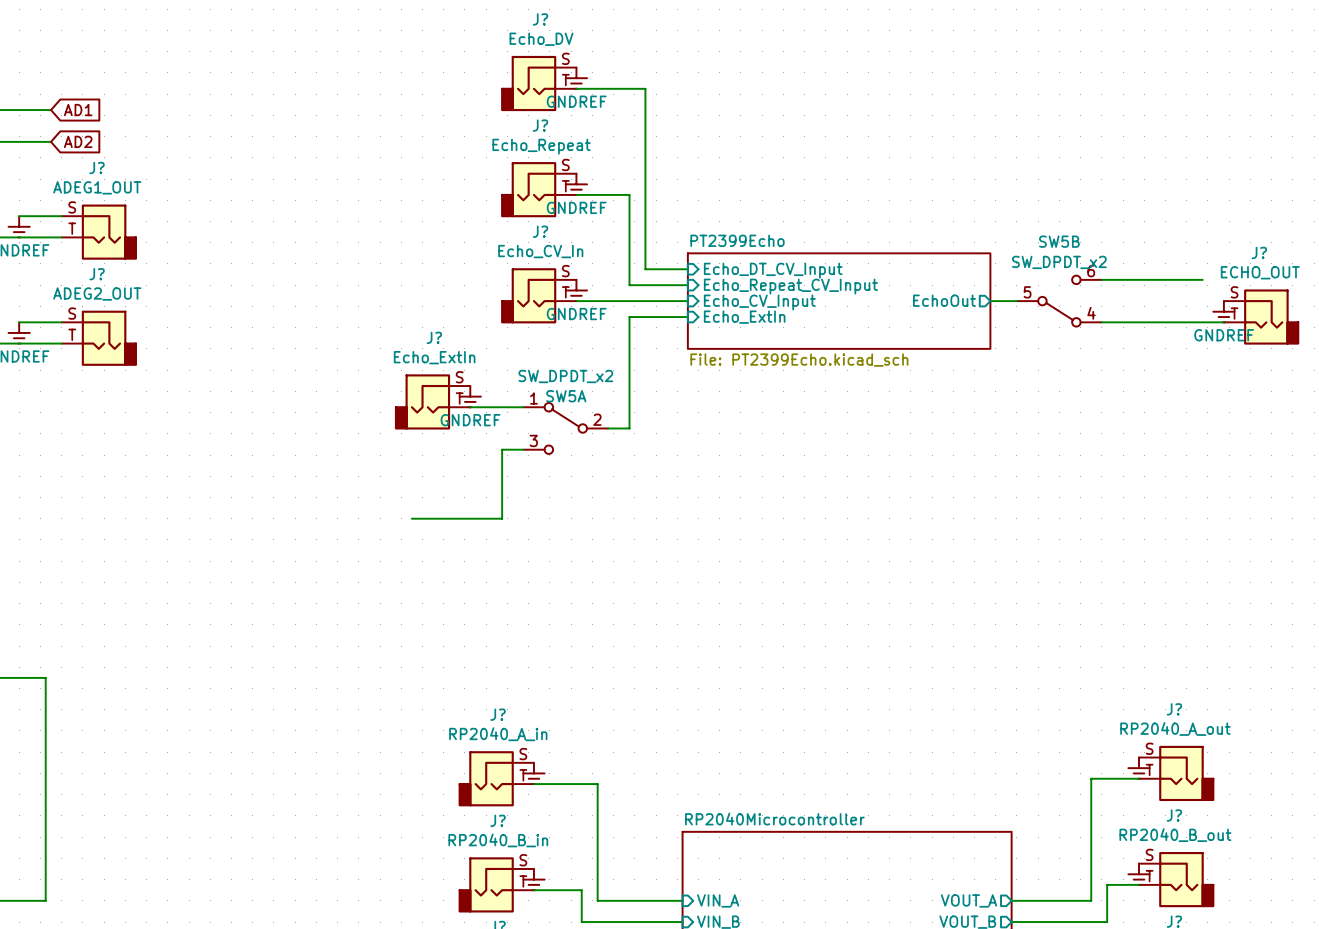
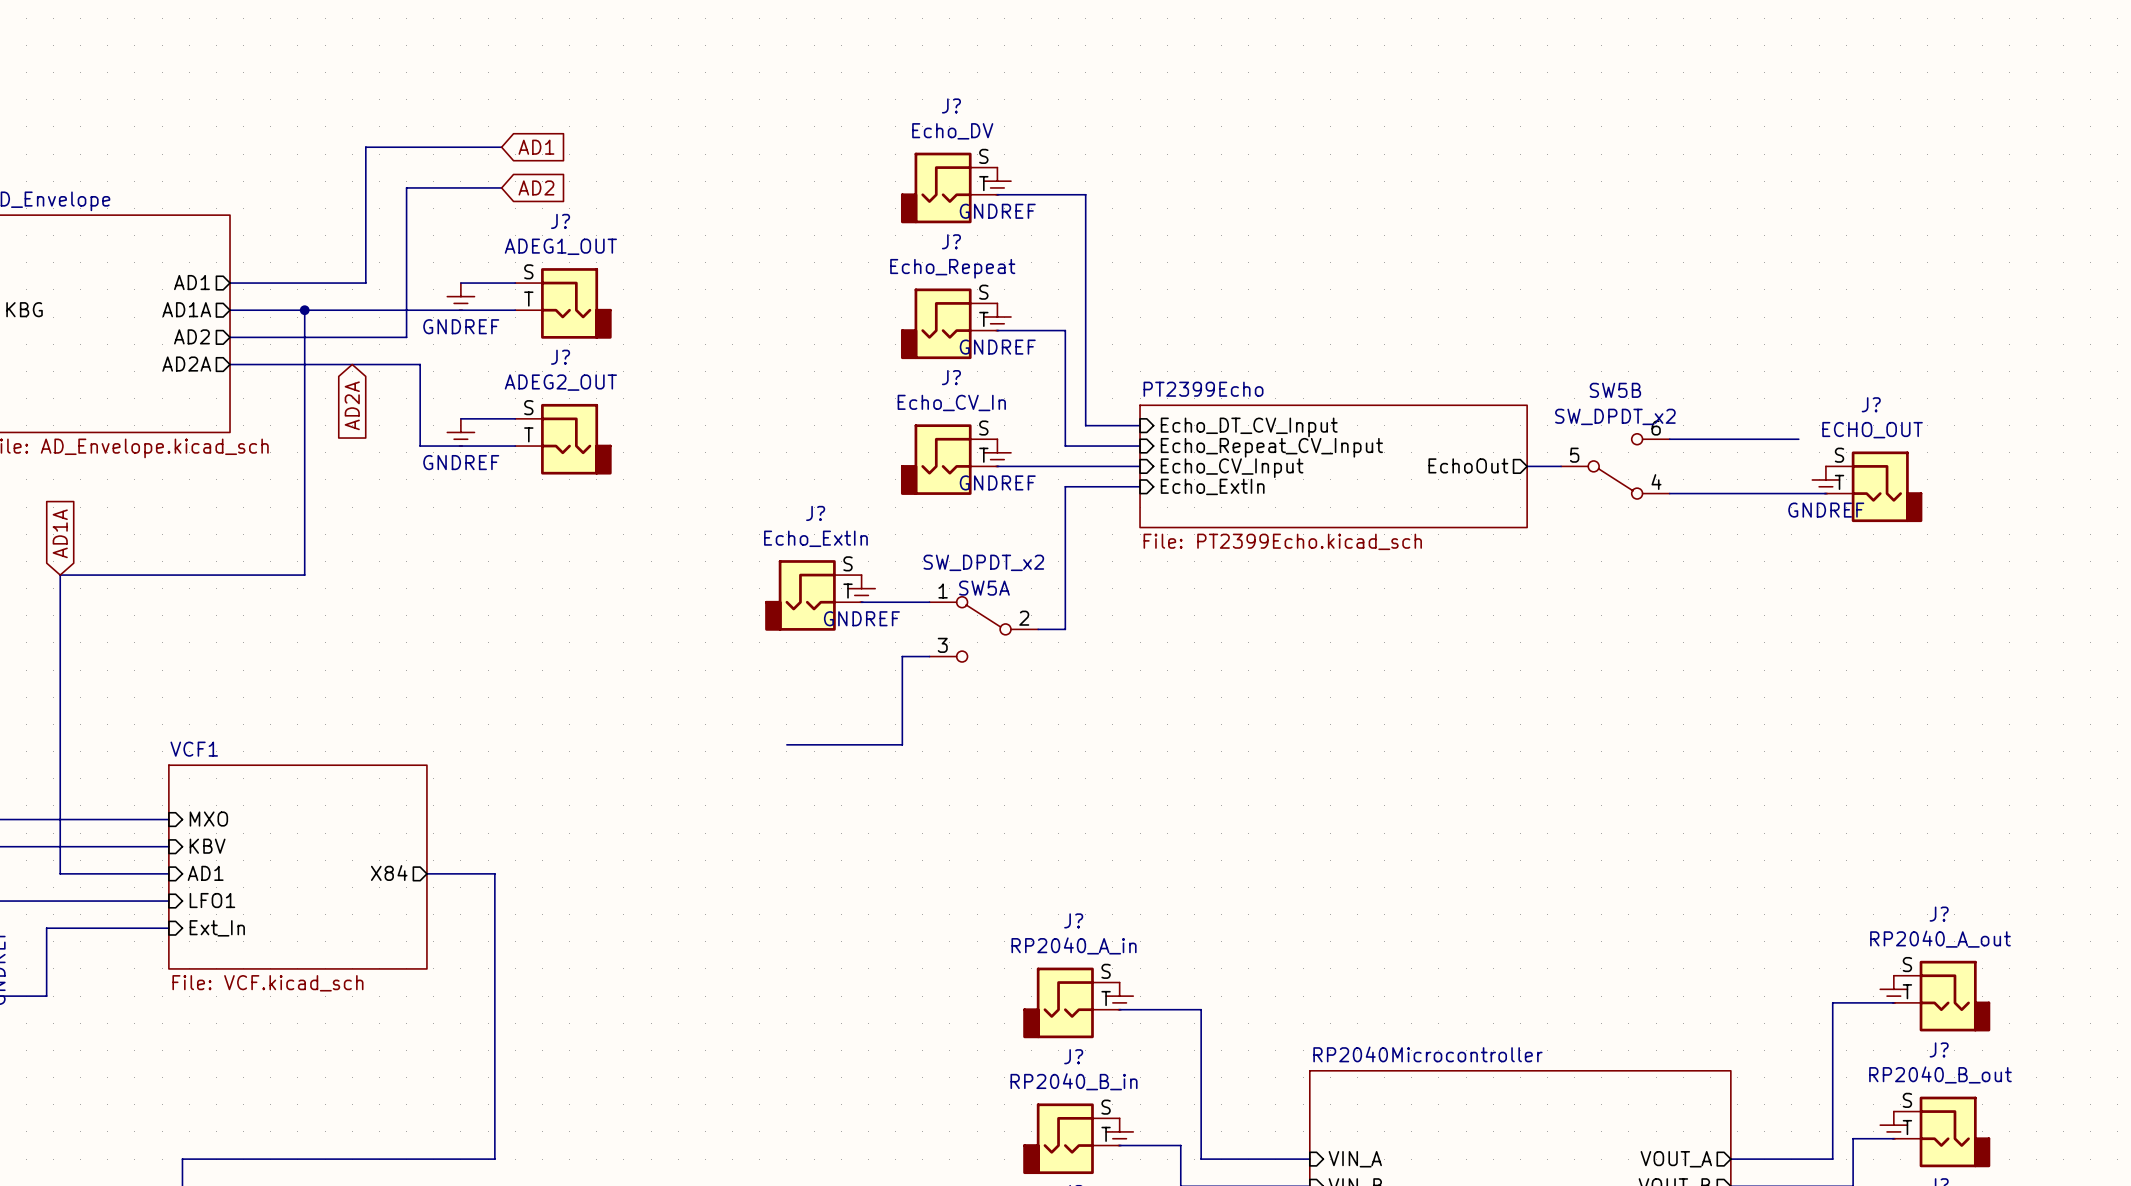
power symbol: GNDREF (576, 78) -> none
J? position: (538, 83) -> (949, 187)
wire: (576, 88) (645, 88) (645, 269) (687, 269) -> (997, 194) (1085, 194) (1085, 425) (1140, 425)
power symbol: none -> GNDREF (997, 181)
power symbol: GNDREF (576, 184) -> none
J? position: (538, 189) -> (949, 323)
wire: (576, 194) (629, 194) (629, 285) (687, 285) -> (997, 330) (1065, 330) (1065, 446) (1140, 446)
power symbol: none -> GNDREF (997, 317)
sheet pin position: Echo_DT_CV_Input (773, 270) -> Echo_DT_CV_Input (1249, 427)
wire: (1101, 279) (1202, 279) -> (1669, 439) (1798, 439)
sheet pin position: Echo_Repeat_CV_Input (790, 286) -> Echo_Repeat_CV_Input (1271, 447)
power symbol: GNDREF (576, 290) -> none
J? position: (538, 295) -> (949, 459)
sheet pin position: EchoOut (944, 300) -> EchoOut (1468, 465)
wire: (576, 301) (687, 301) -> (997, 466) (1140, 466)
sheet PT2399Echo position: (839, 301) -> (1333, 466)
wire: (990, 301) (1016, 301) -> (1527, 466) (1561, 466)
SW5B position: (1059, 301) -> (1615, 466)
sheet pin position: Echo_CV_Input (759, 302) -> Echo_CV_Input (1232, 468)
power symbol position: GNDREF (1223, 311) -> GNDREF (1825, 479)
wire: (687, 317) (629, 317) (629, 428) (608, 428) -> (1140, 486) (1065, 486) (1065, 629) (1038, 629)
sheet pin position: Echo_ExtIn (744, 317) -> Echo_ExtIn (1212, 486)
J? position: (1261, 317) -> (1874, 486)
wire: (1101, 322) (1223, 322) -> (1669, 493) (1825, 493)
power symbol position: GNDREF (470, 396) -> GNDREF (997, 452)
J? position: (432, 401) -> (813, 595)
wire: (470, 407) (523, 407) -> (861, 602) (929, 602)
SW5A position: (565, 428) -> (983, 629)
wire: (523, 449) (502, 449) (502, 518) (411, 518) -> (929, 656) (902, 656) (902, 744) (786, 744)
power symbol: none -> GNDREF (861, 588)

